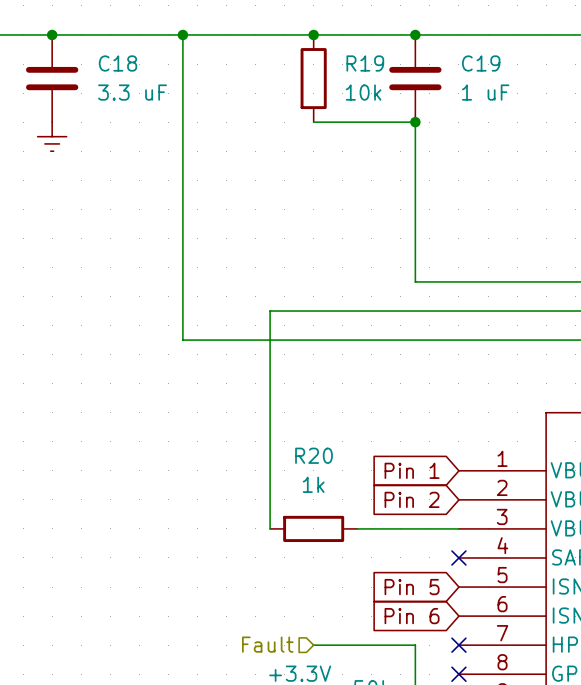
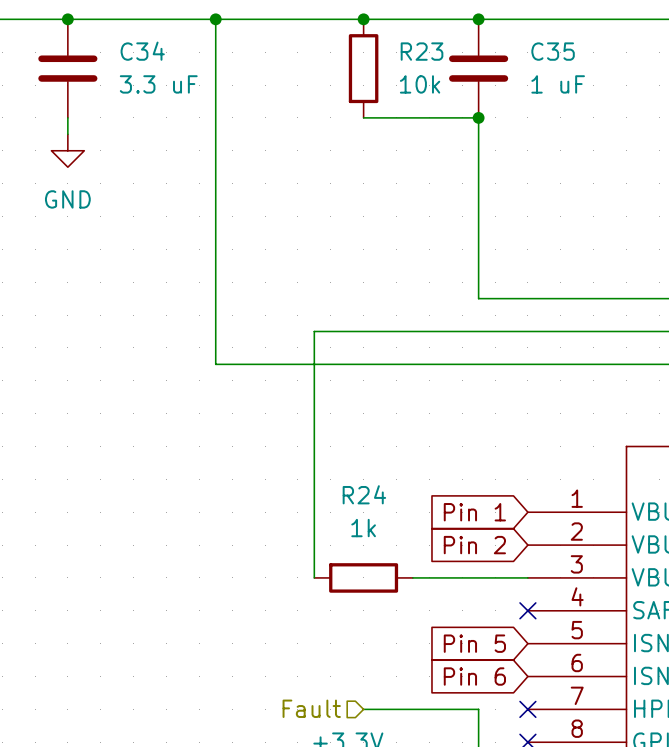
C18 name: C18 (117, 63) -> C34 (142, 51)
R19 name: R19 (365, 63) -> R23 (422, 51)
C19 name: C19 (481, 63) -> C35 (553, 51)
power symbol: (52, 136) -> none
power symbol: none -> GND (67, 150)
R20 name: R20 (314, 455) -> R24 (364, 494)

